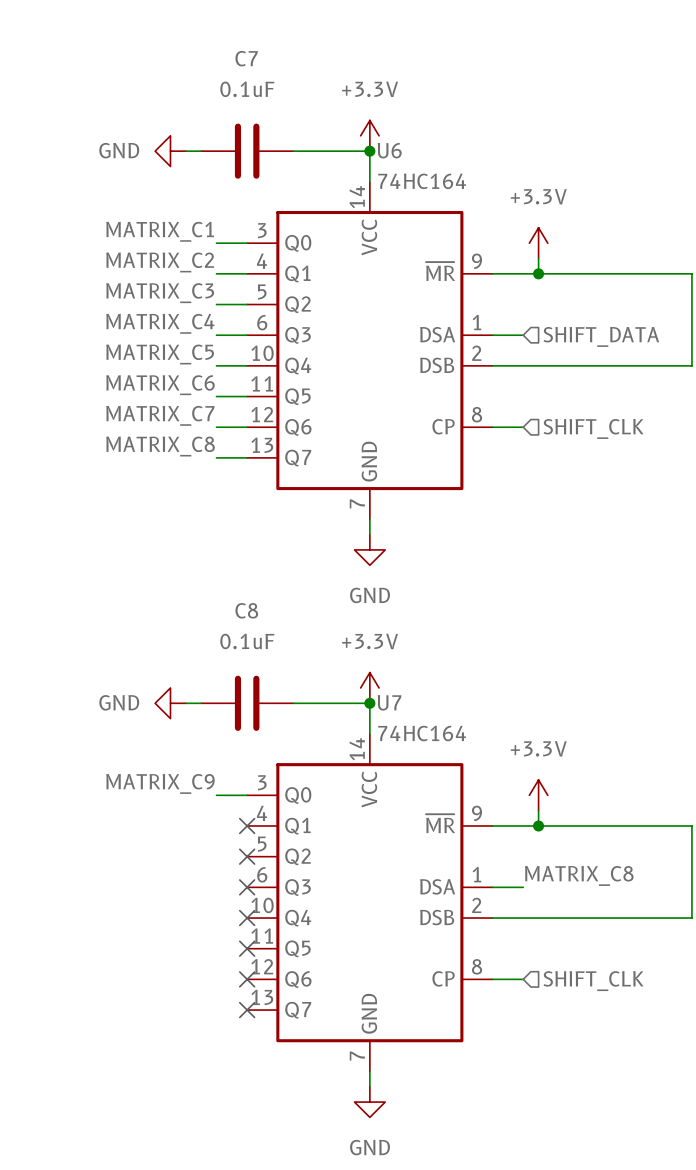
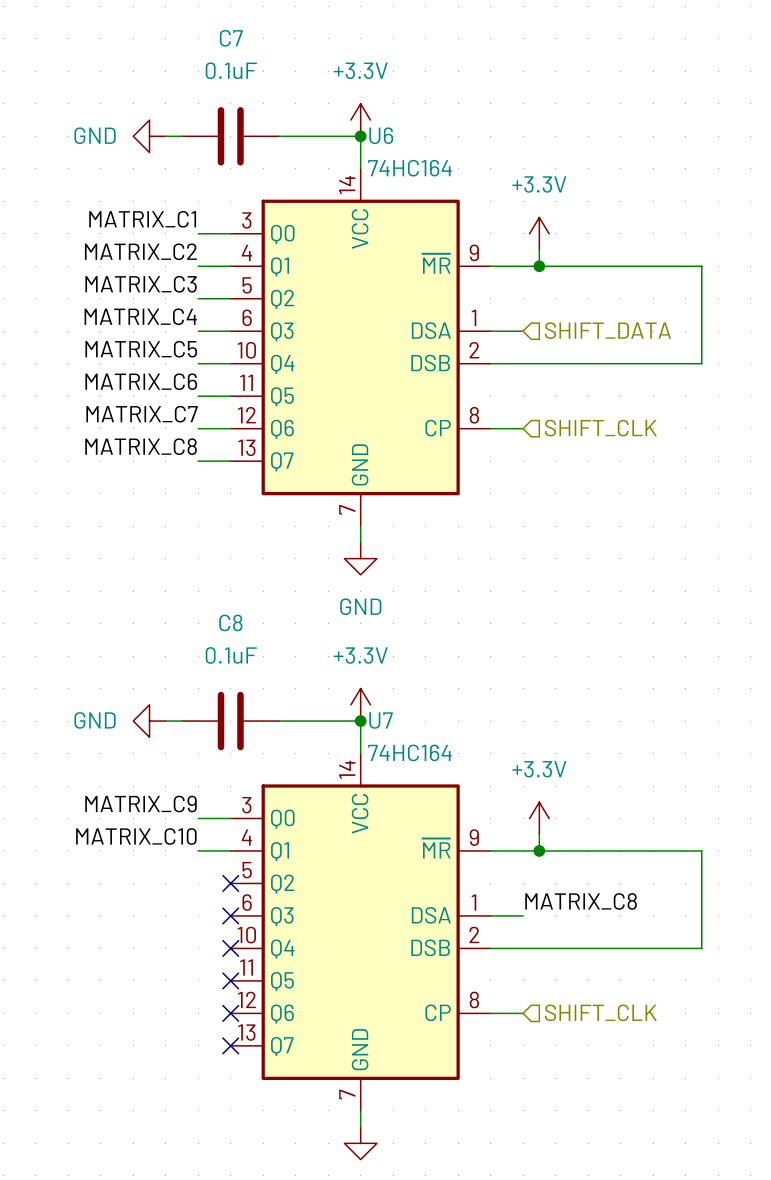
label: none -> MATRIX_C10 (136, 836)
wire: none -> (198, 850) (230, 850)
no-connect mark: (247, 826) -> none

